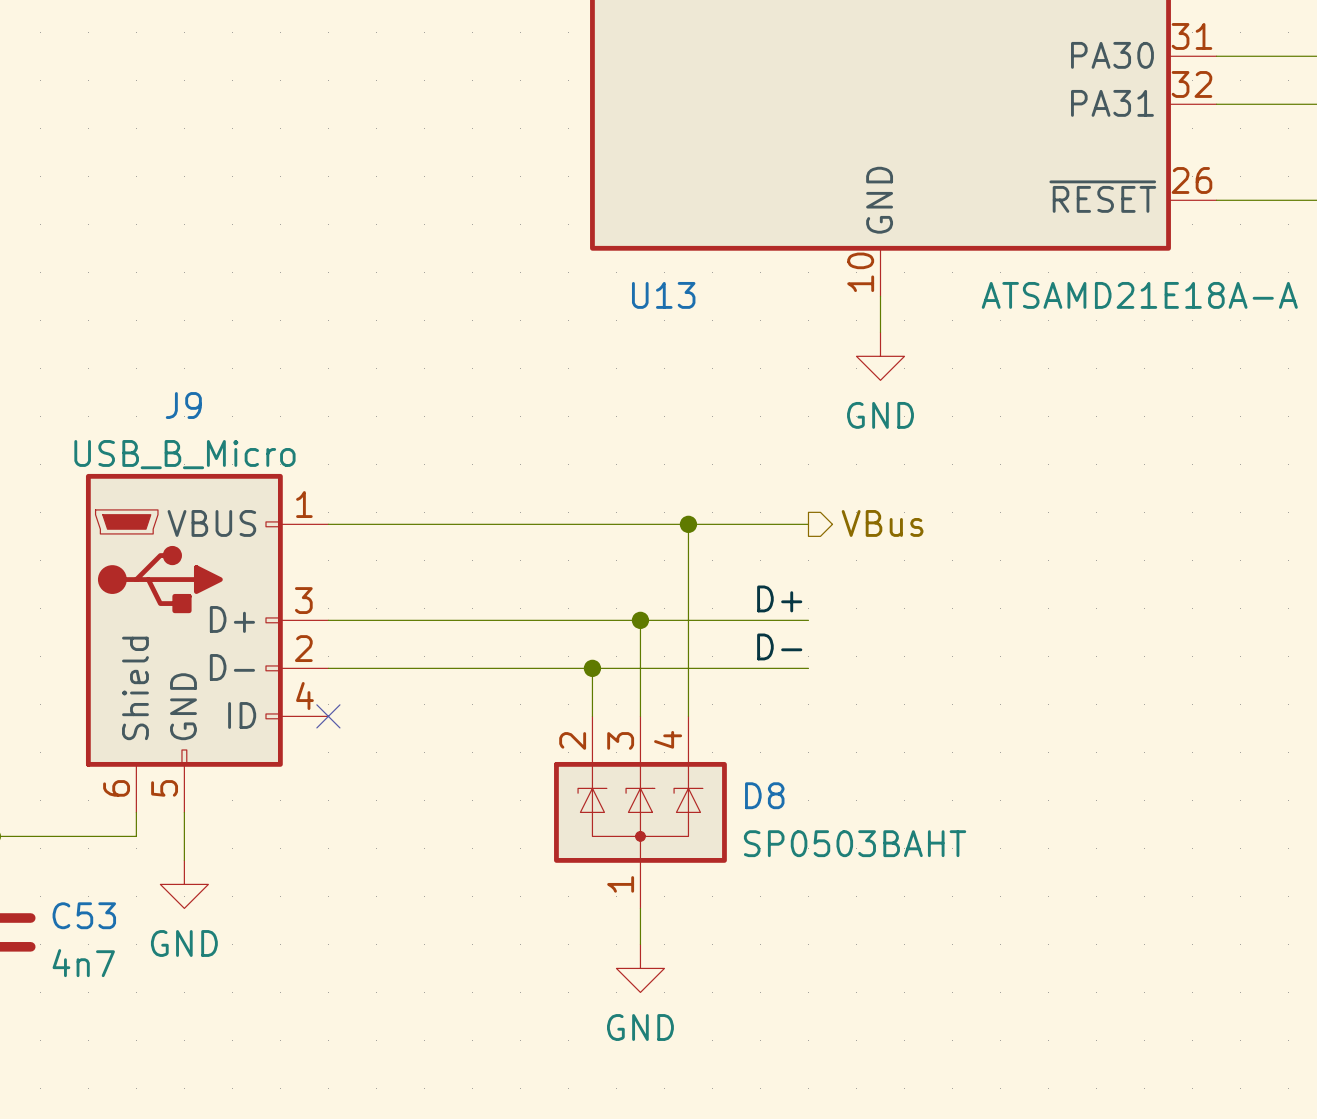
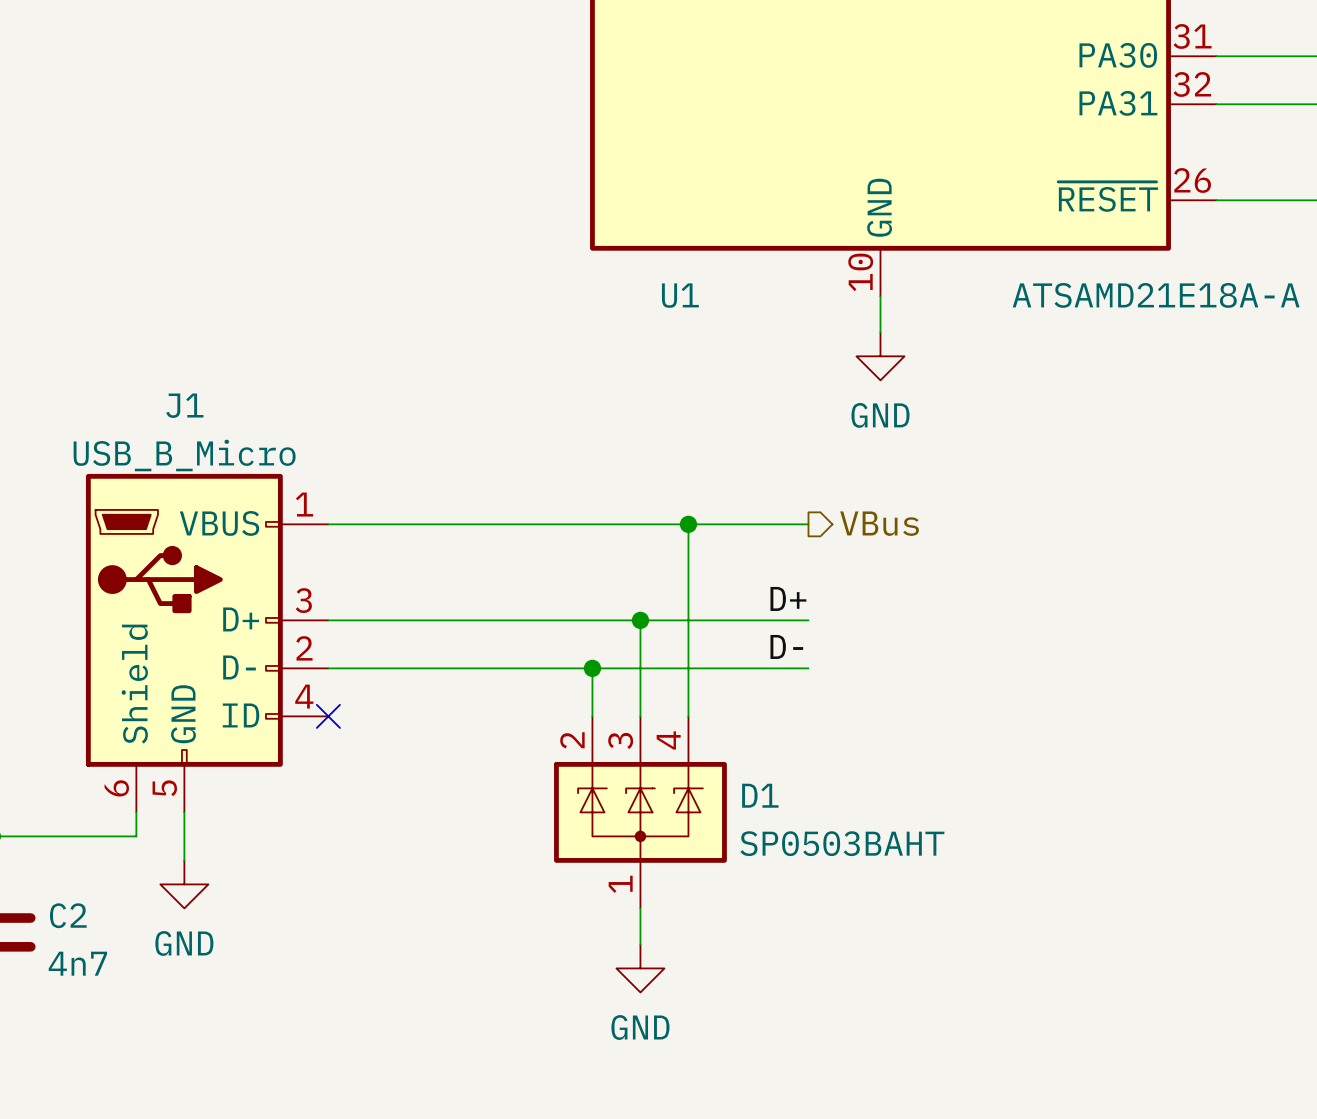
U13 name: U13 (663, 295) -> U1 (680, 295)
J9 name: J9 (183, 405) -> J1 (184, 405)
D8 name: D8 (764, 795) -> D1 (760, 795)
C53 name: C53 (84, 915) -> C2 (68, 915)

